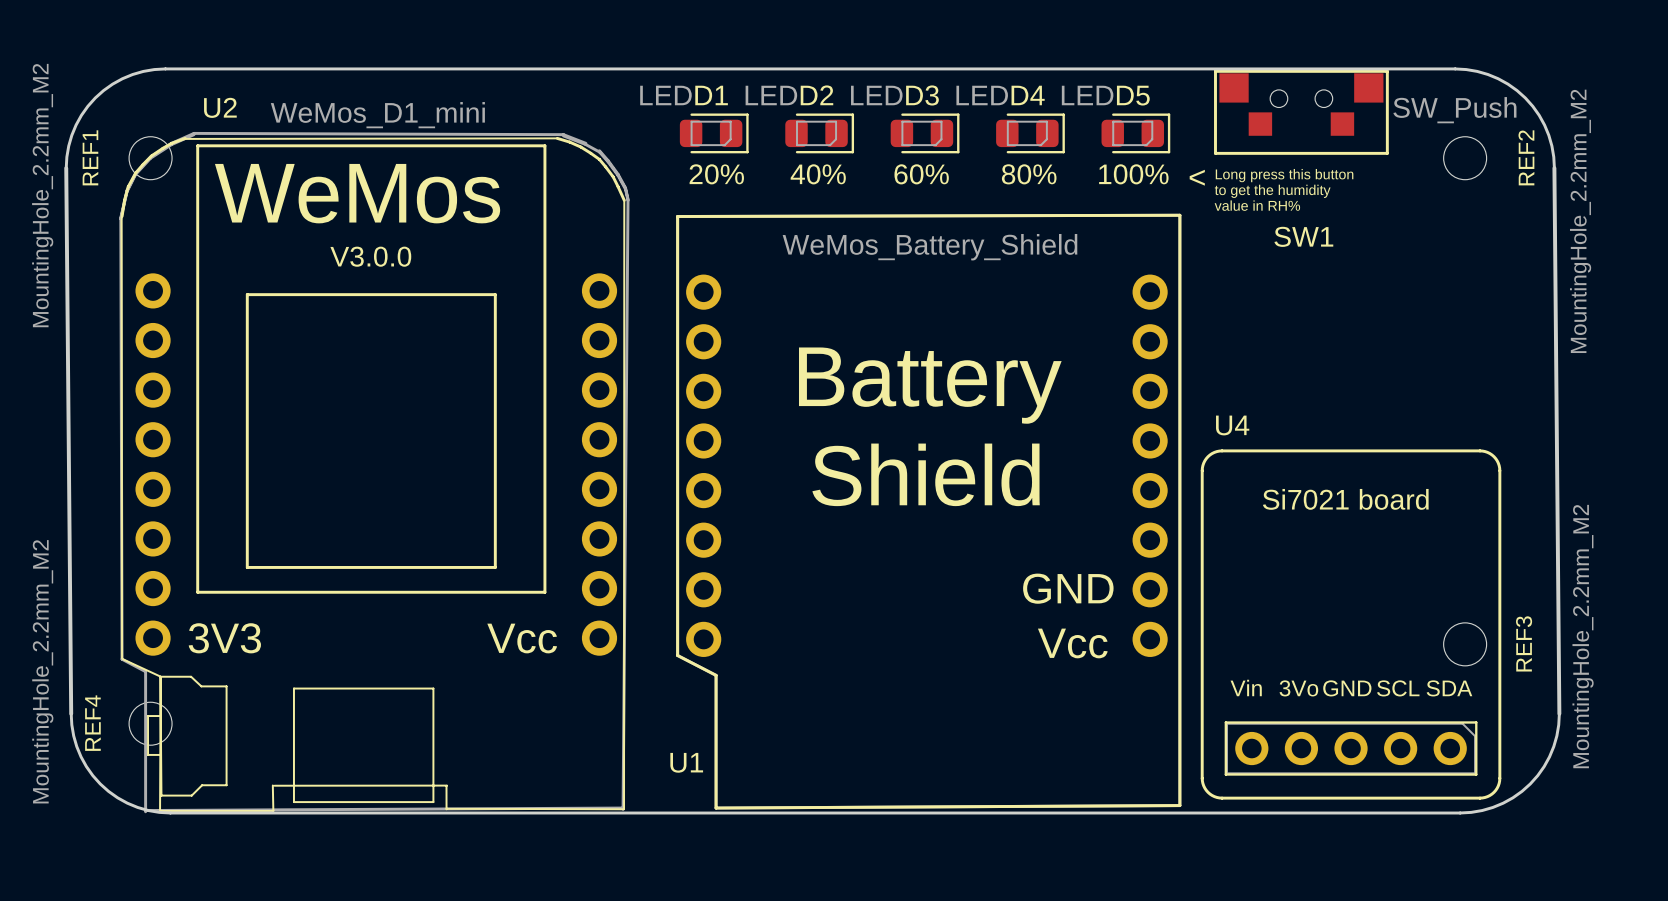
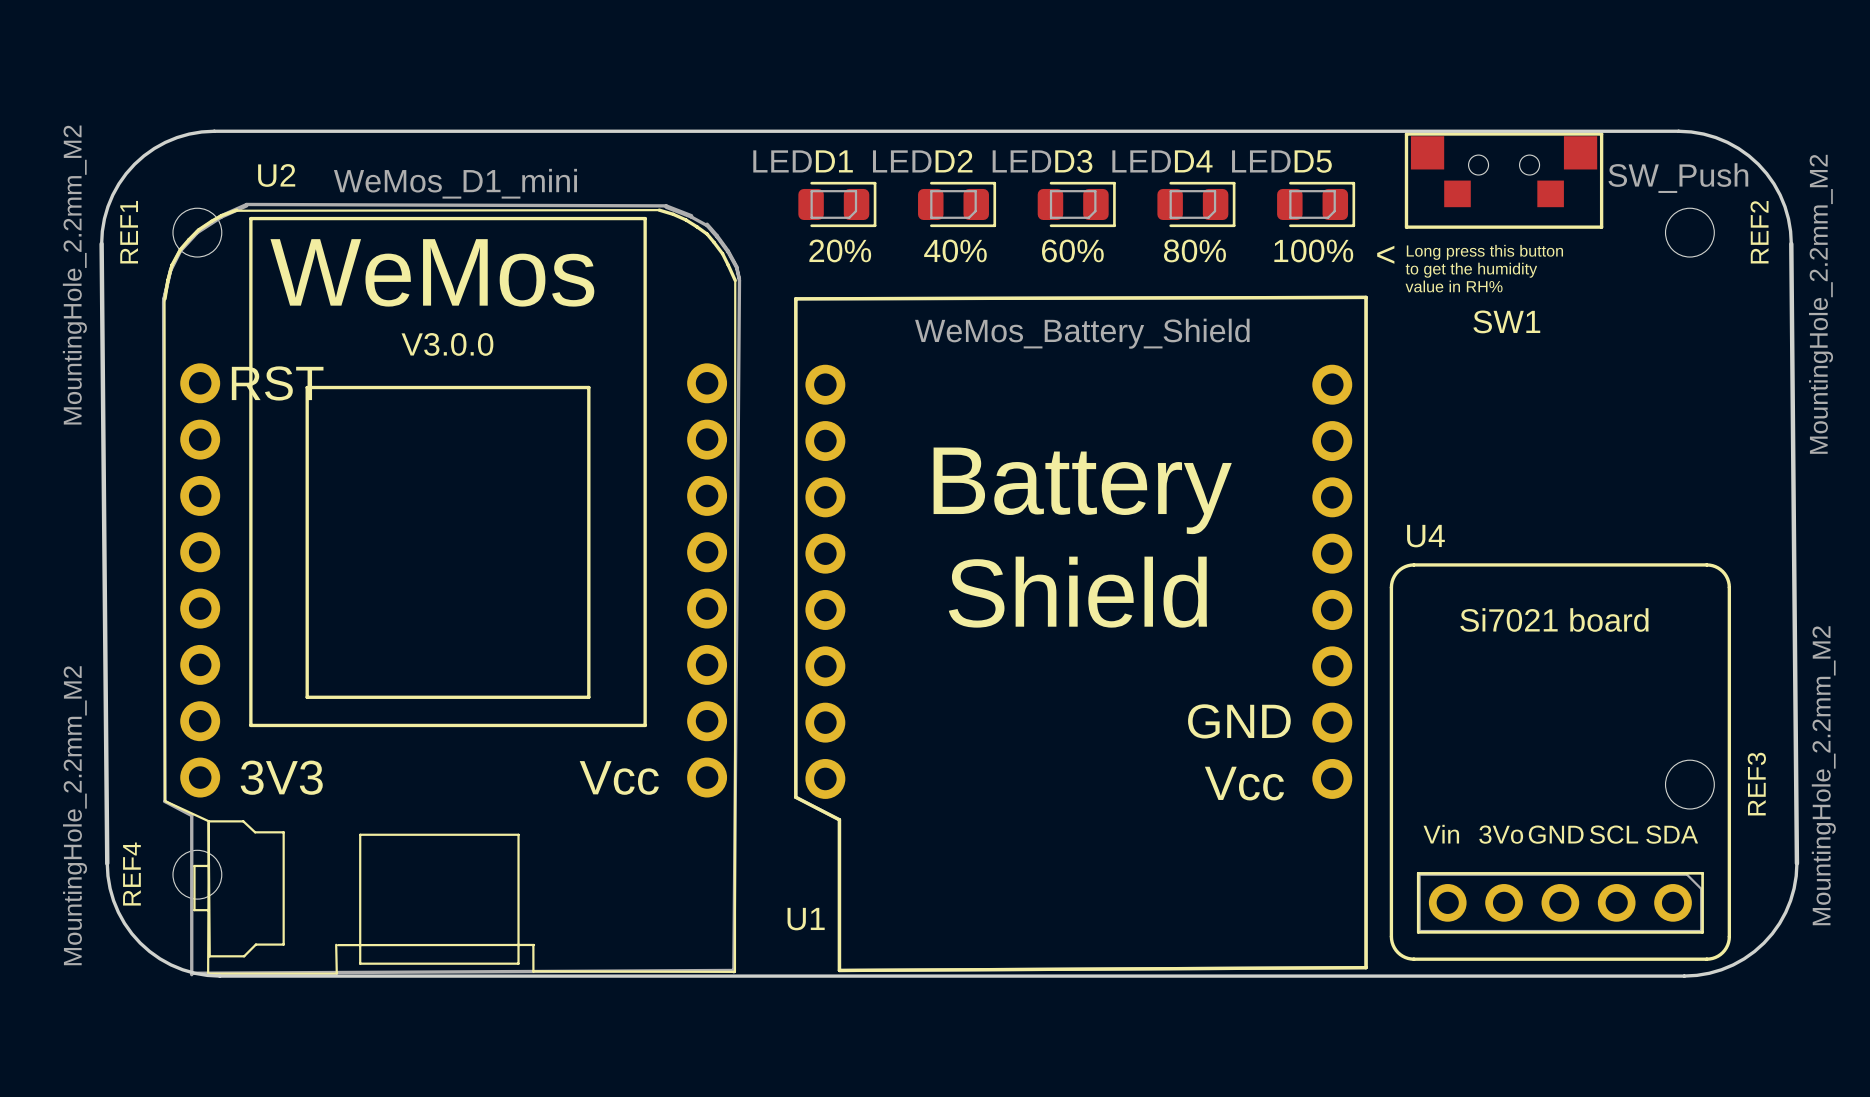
text: none -> RST (277, 383)

